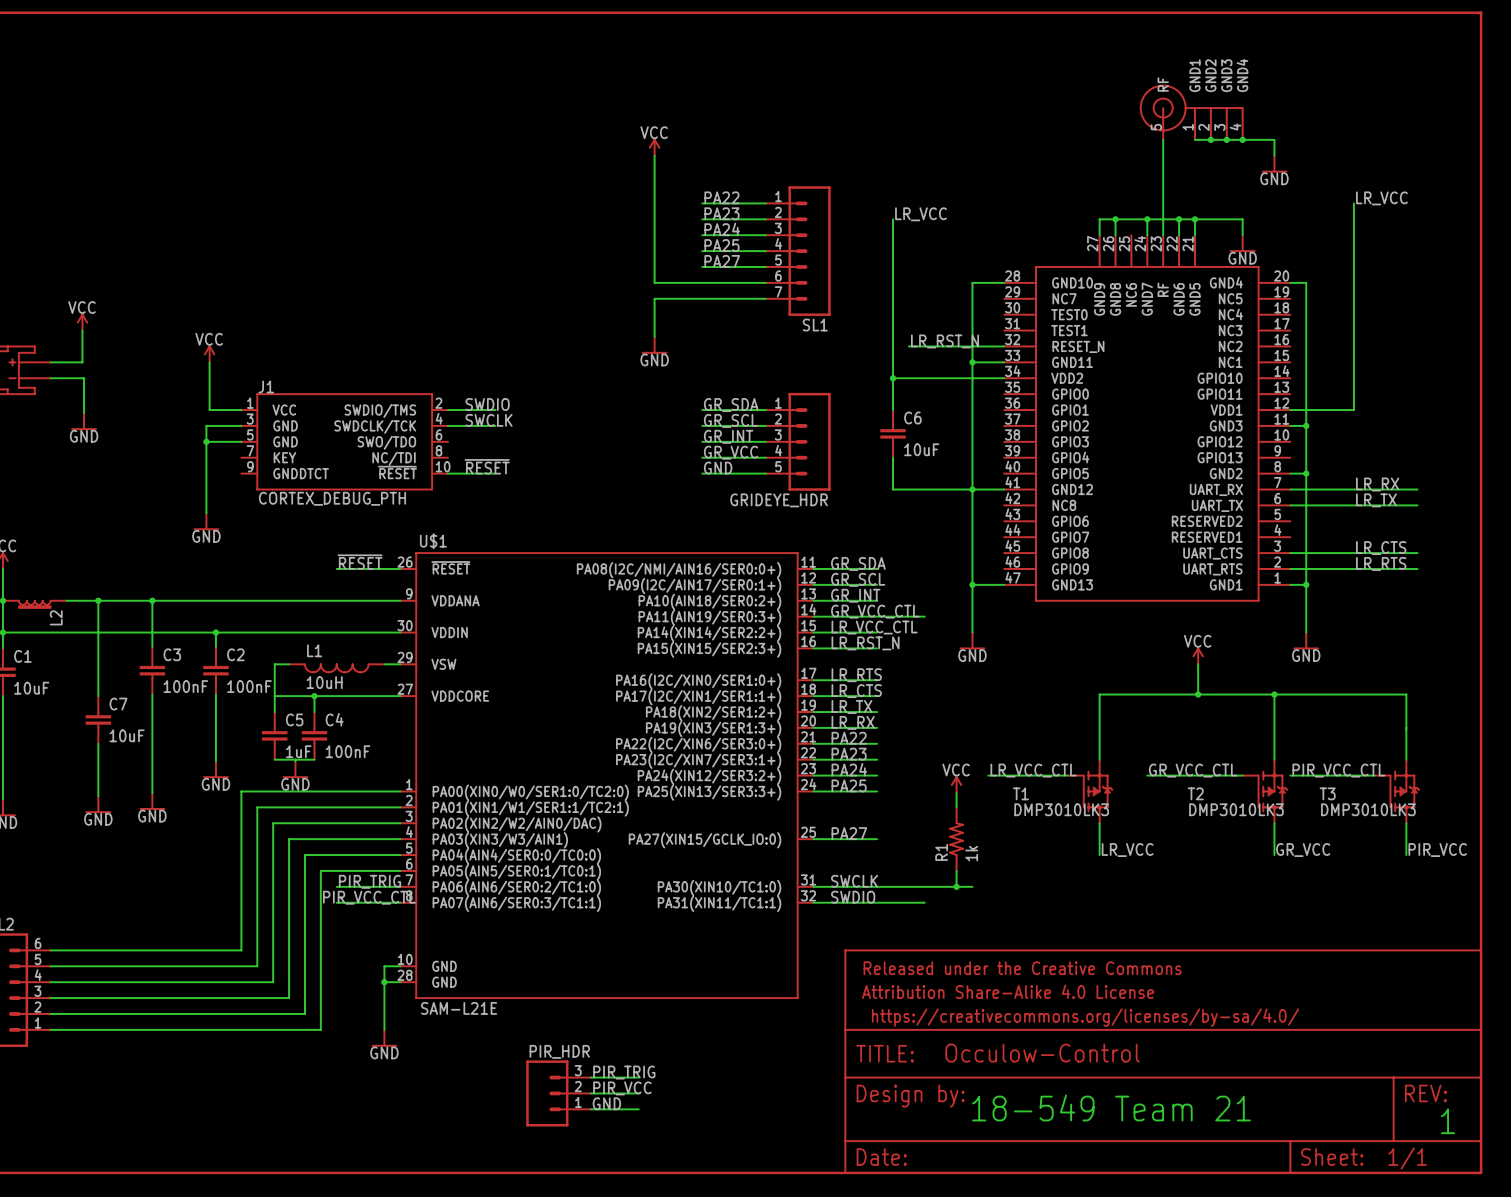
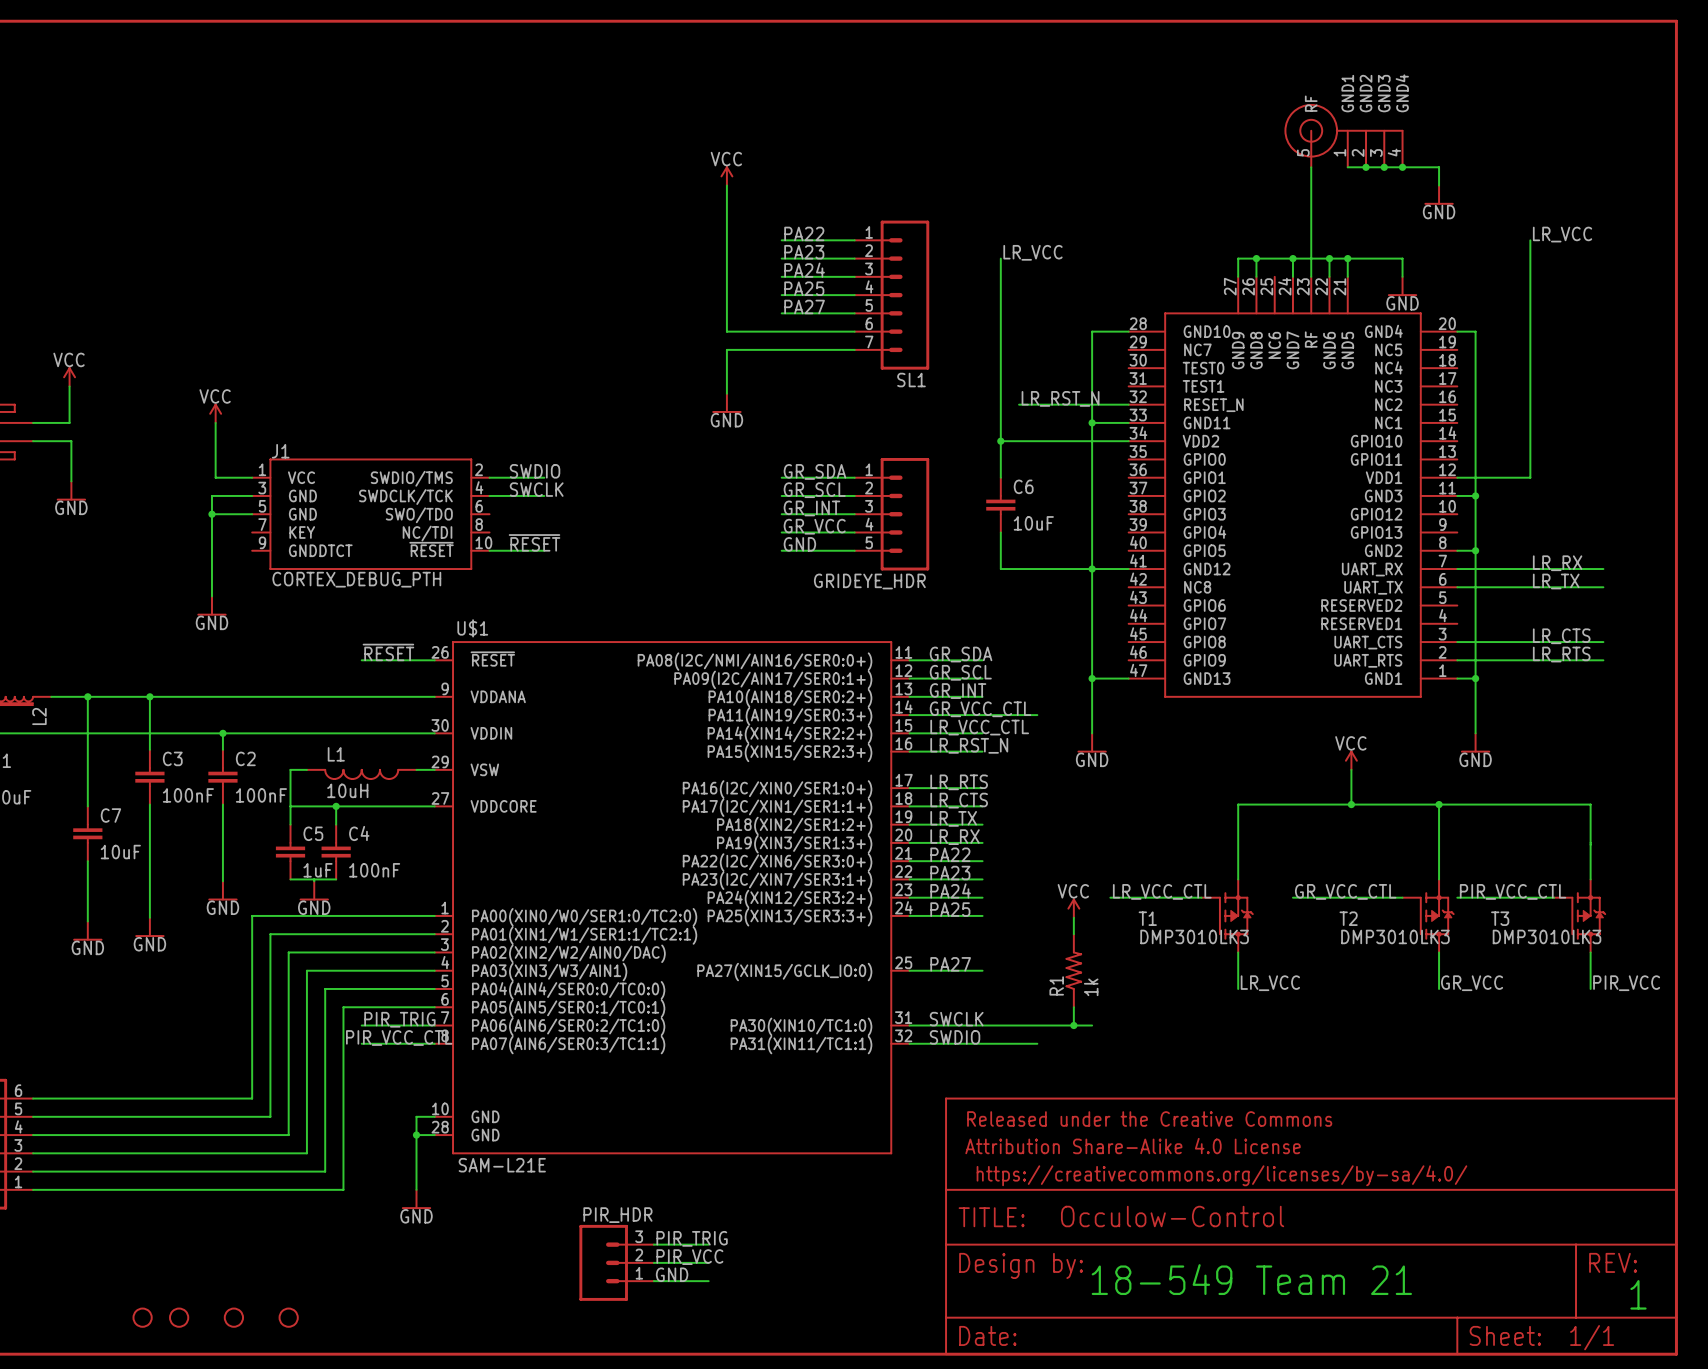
part: none -> (142, 1317)
part: none -> (179, 1317)
part: none -> (233, 1317)
part: none -> (288, 1317)

